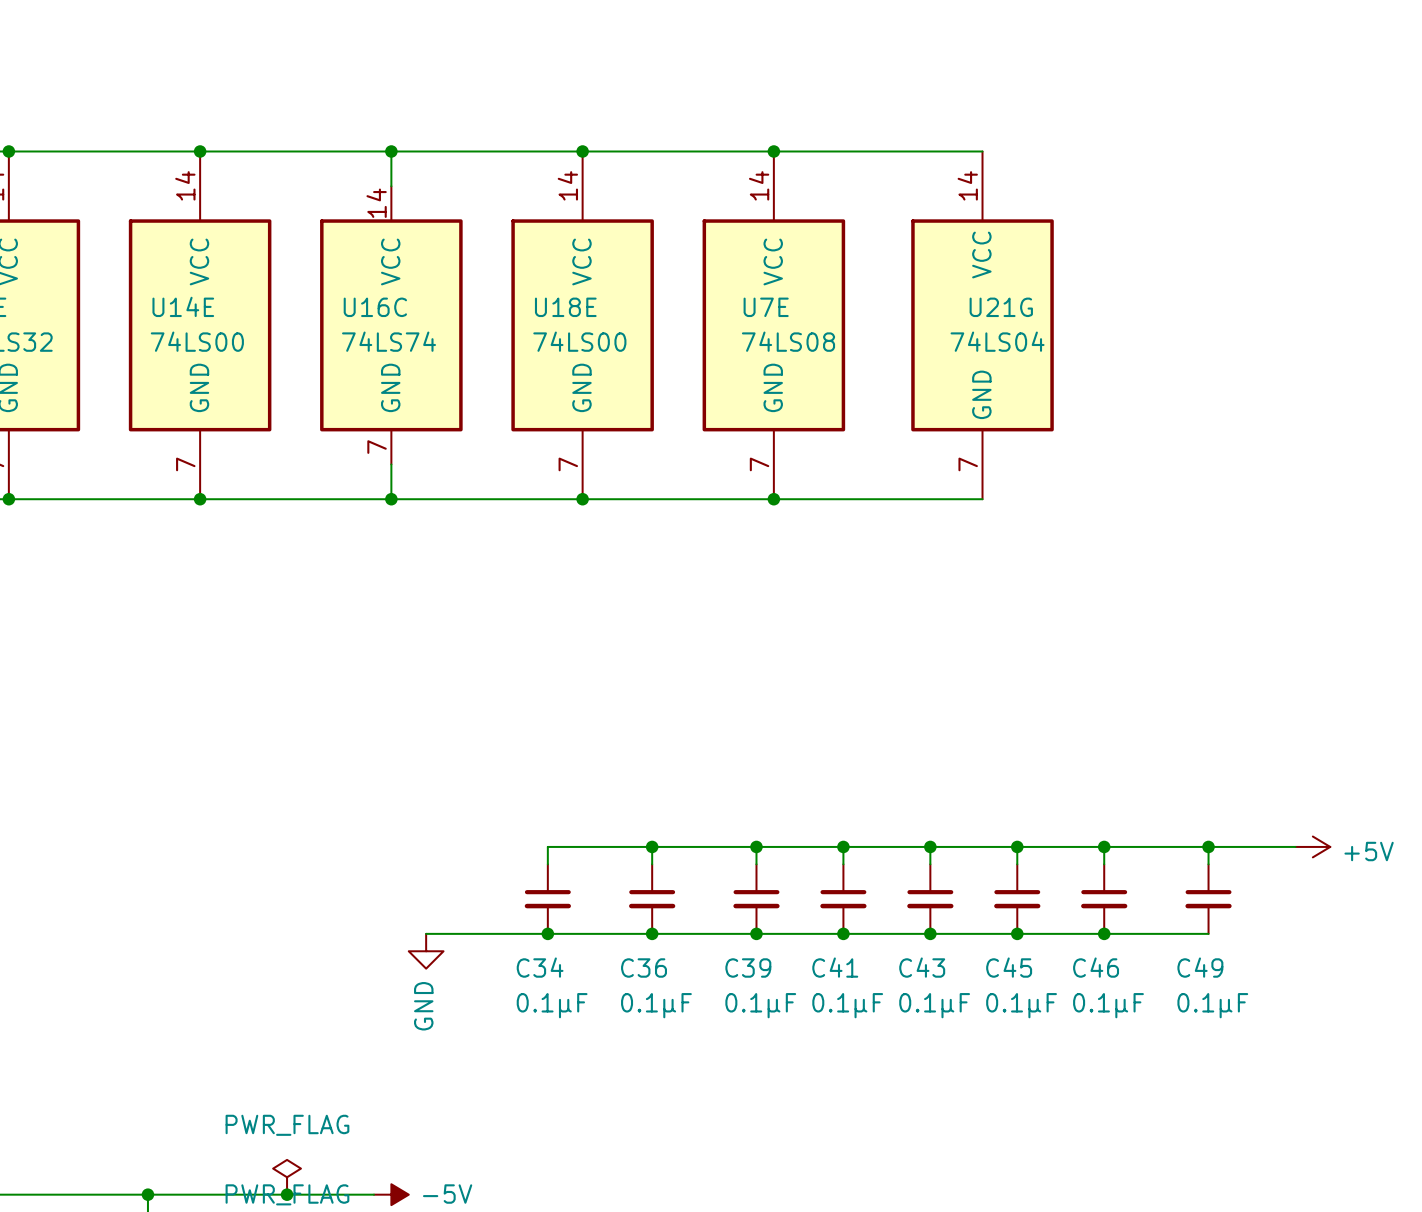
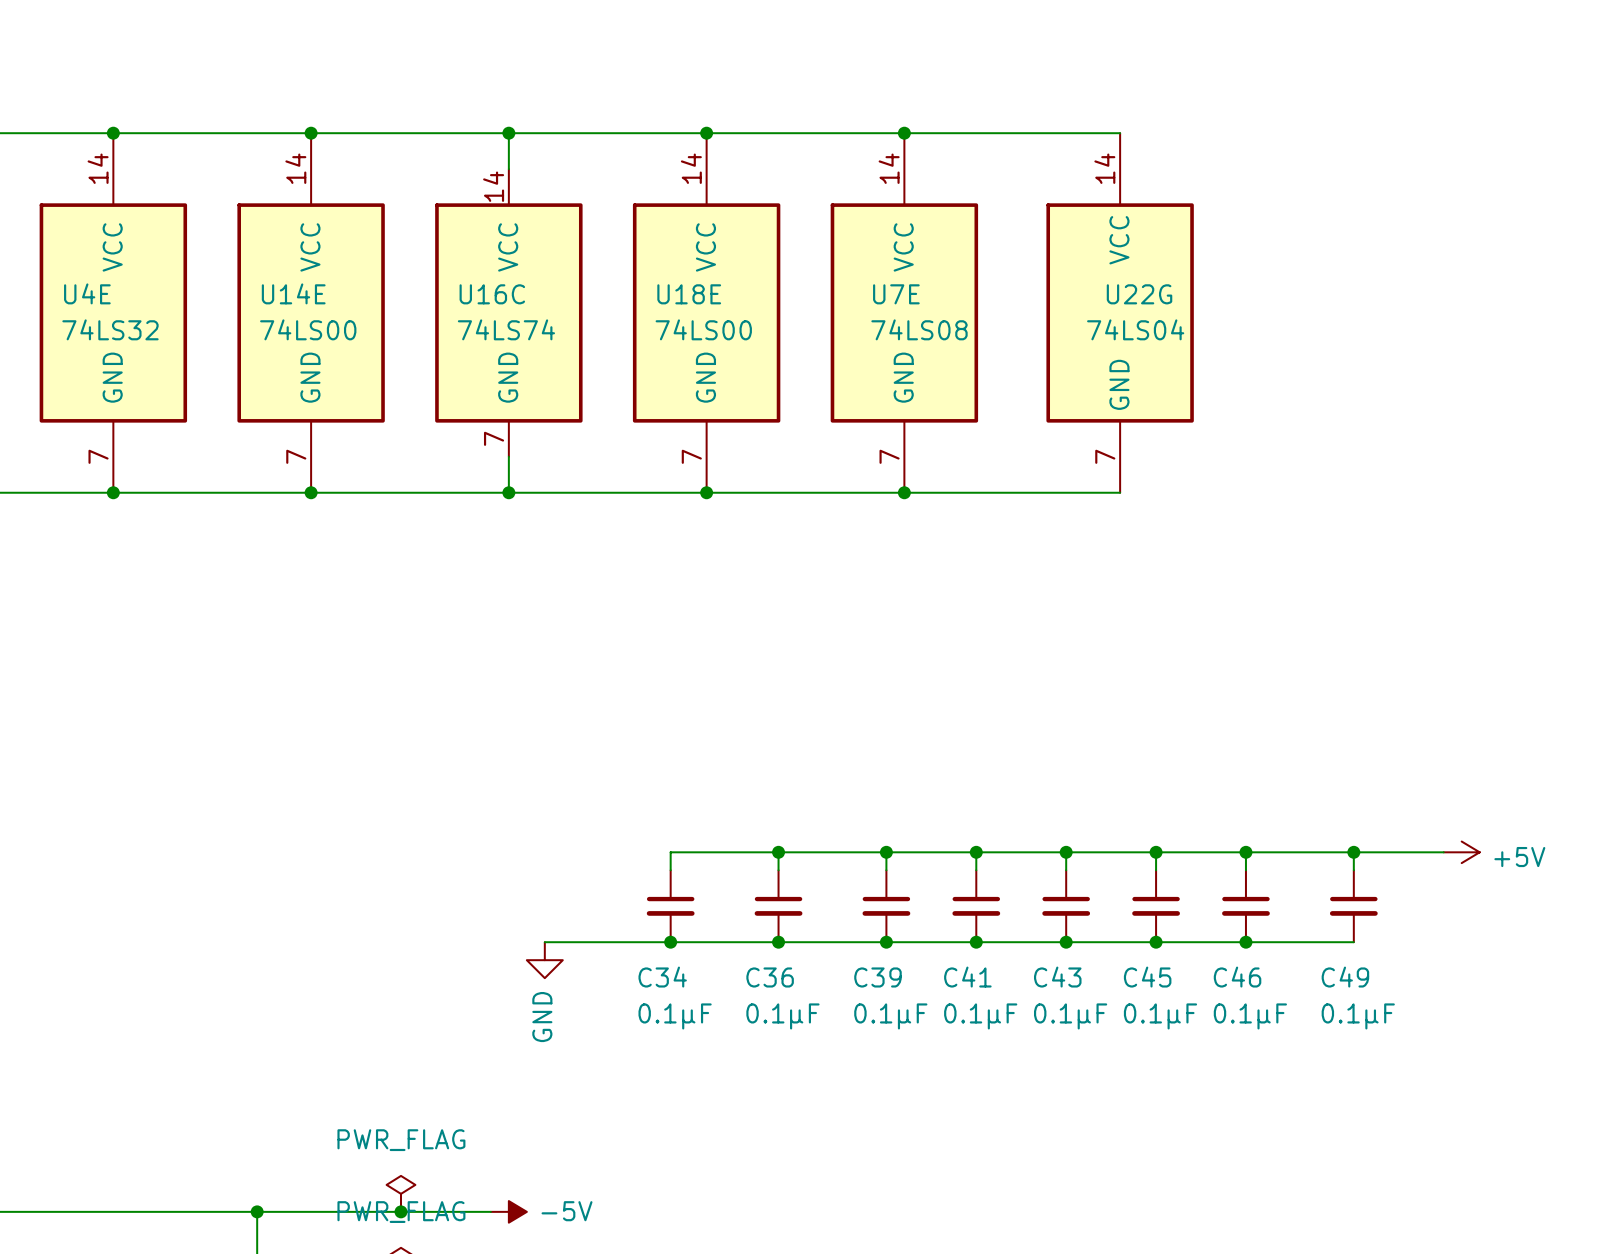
U21G name: U21G (1001, 307) -> U22G (1139, 294)

